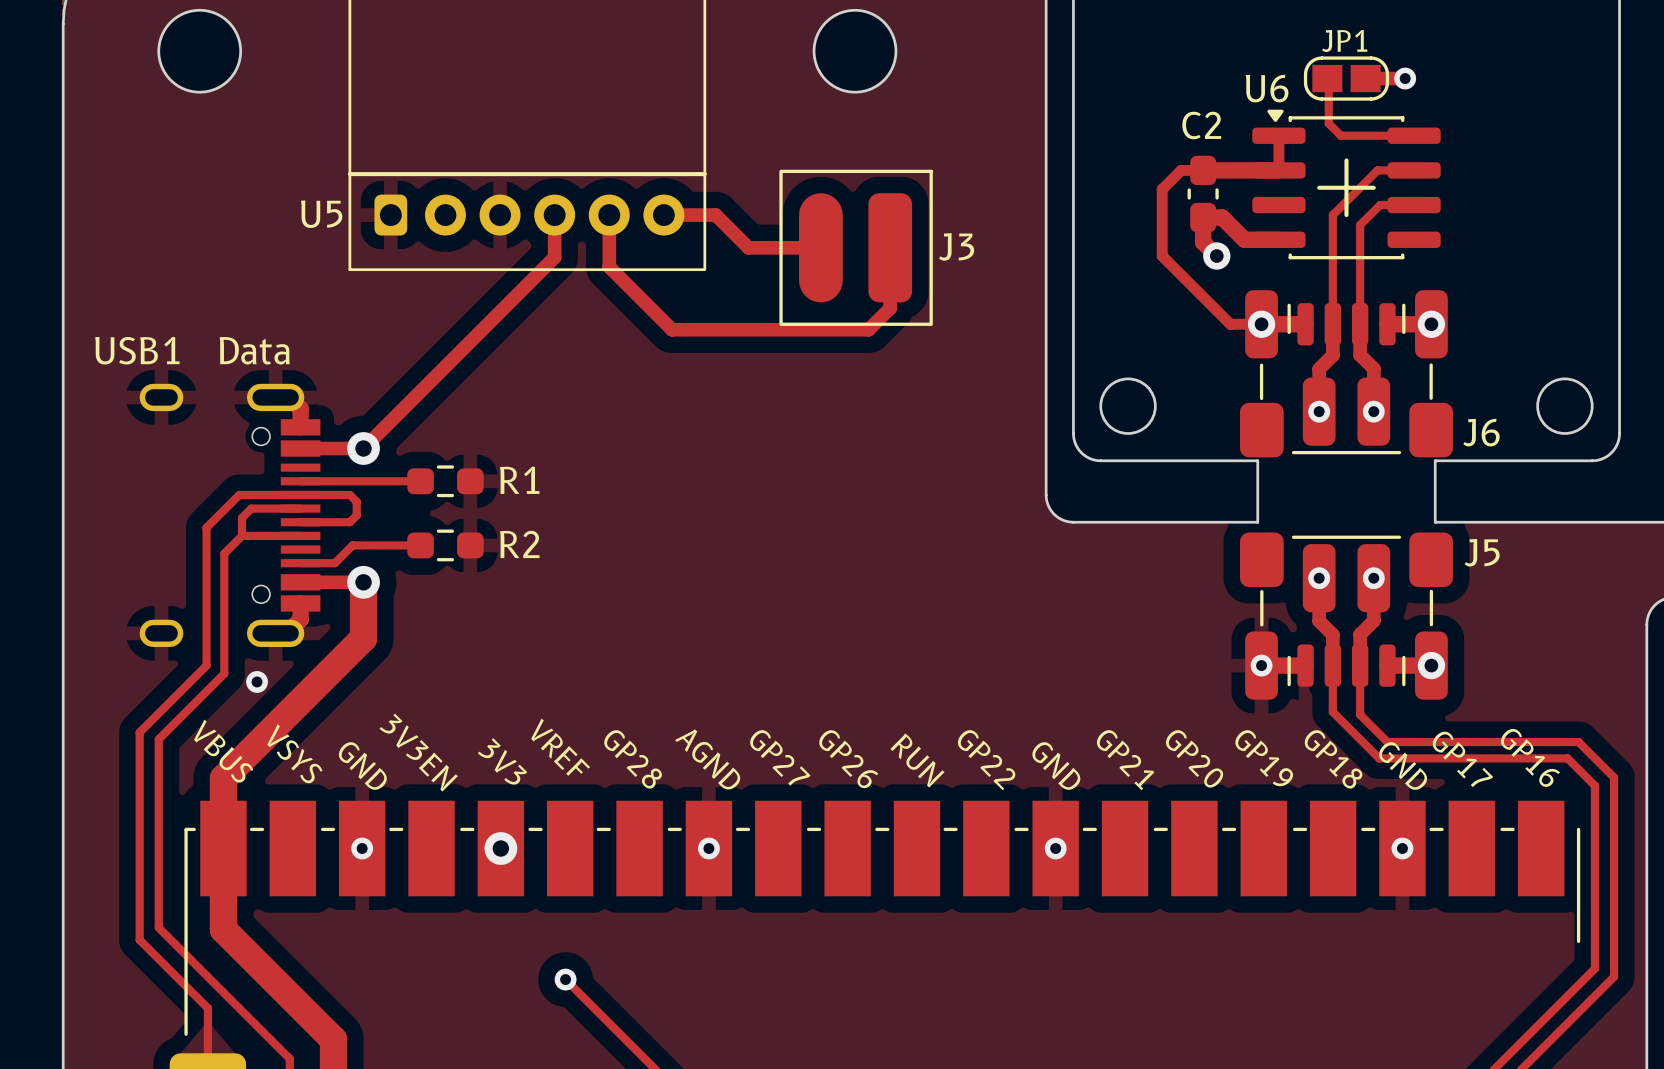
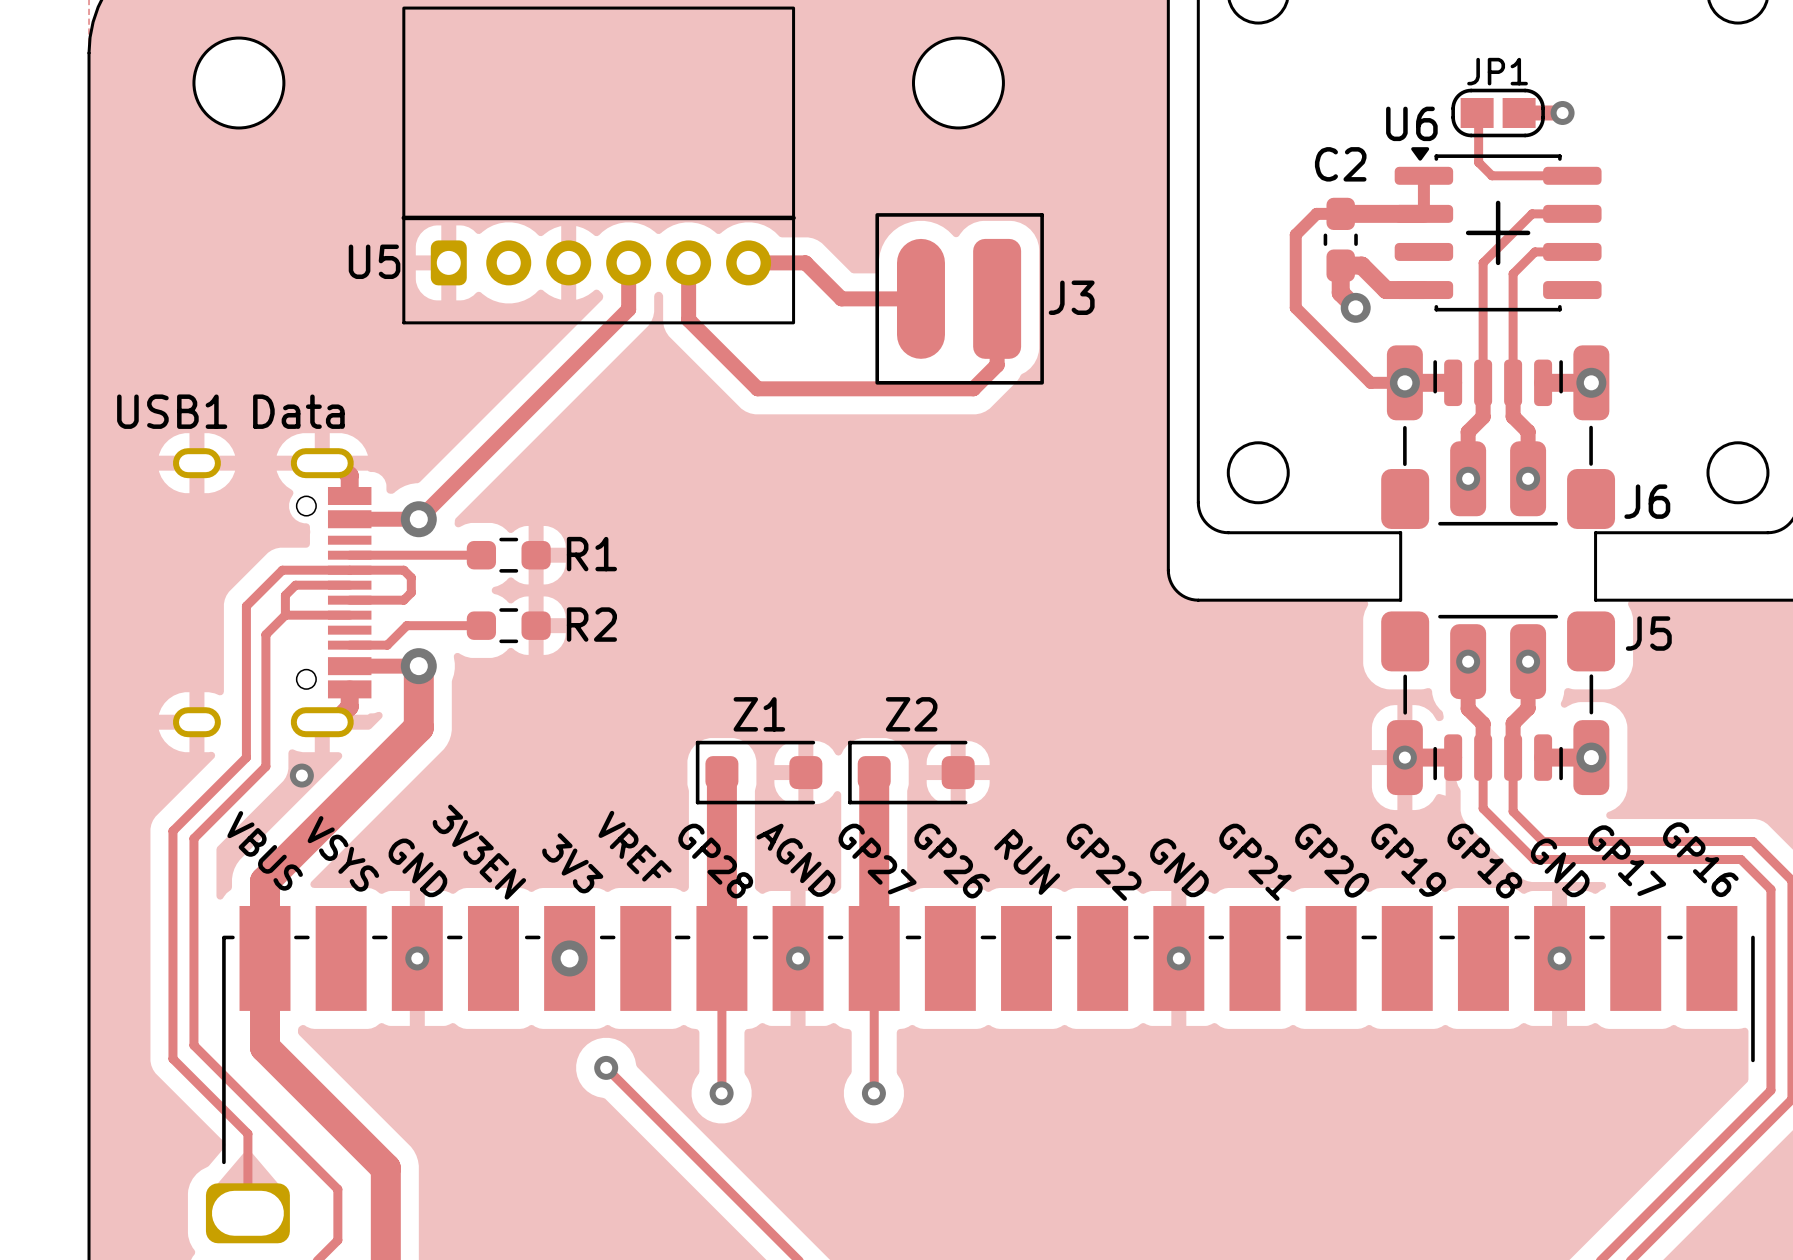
track: none -> (721, 772) (721, 1093)
Z1: none -> (759, 772)
track: none -> (874, 772) (874, 1093)
Z2: none -> (911, 772)
track: none -> (606, 1067) (640, 1102)
via: none -> (606, 1067)
via: none -> (721, 1093)
via: none -> (873, 1093)
via: (565, 979) -> none

